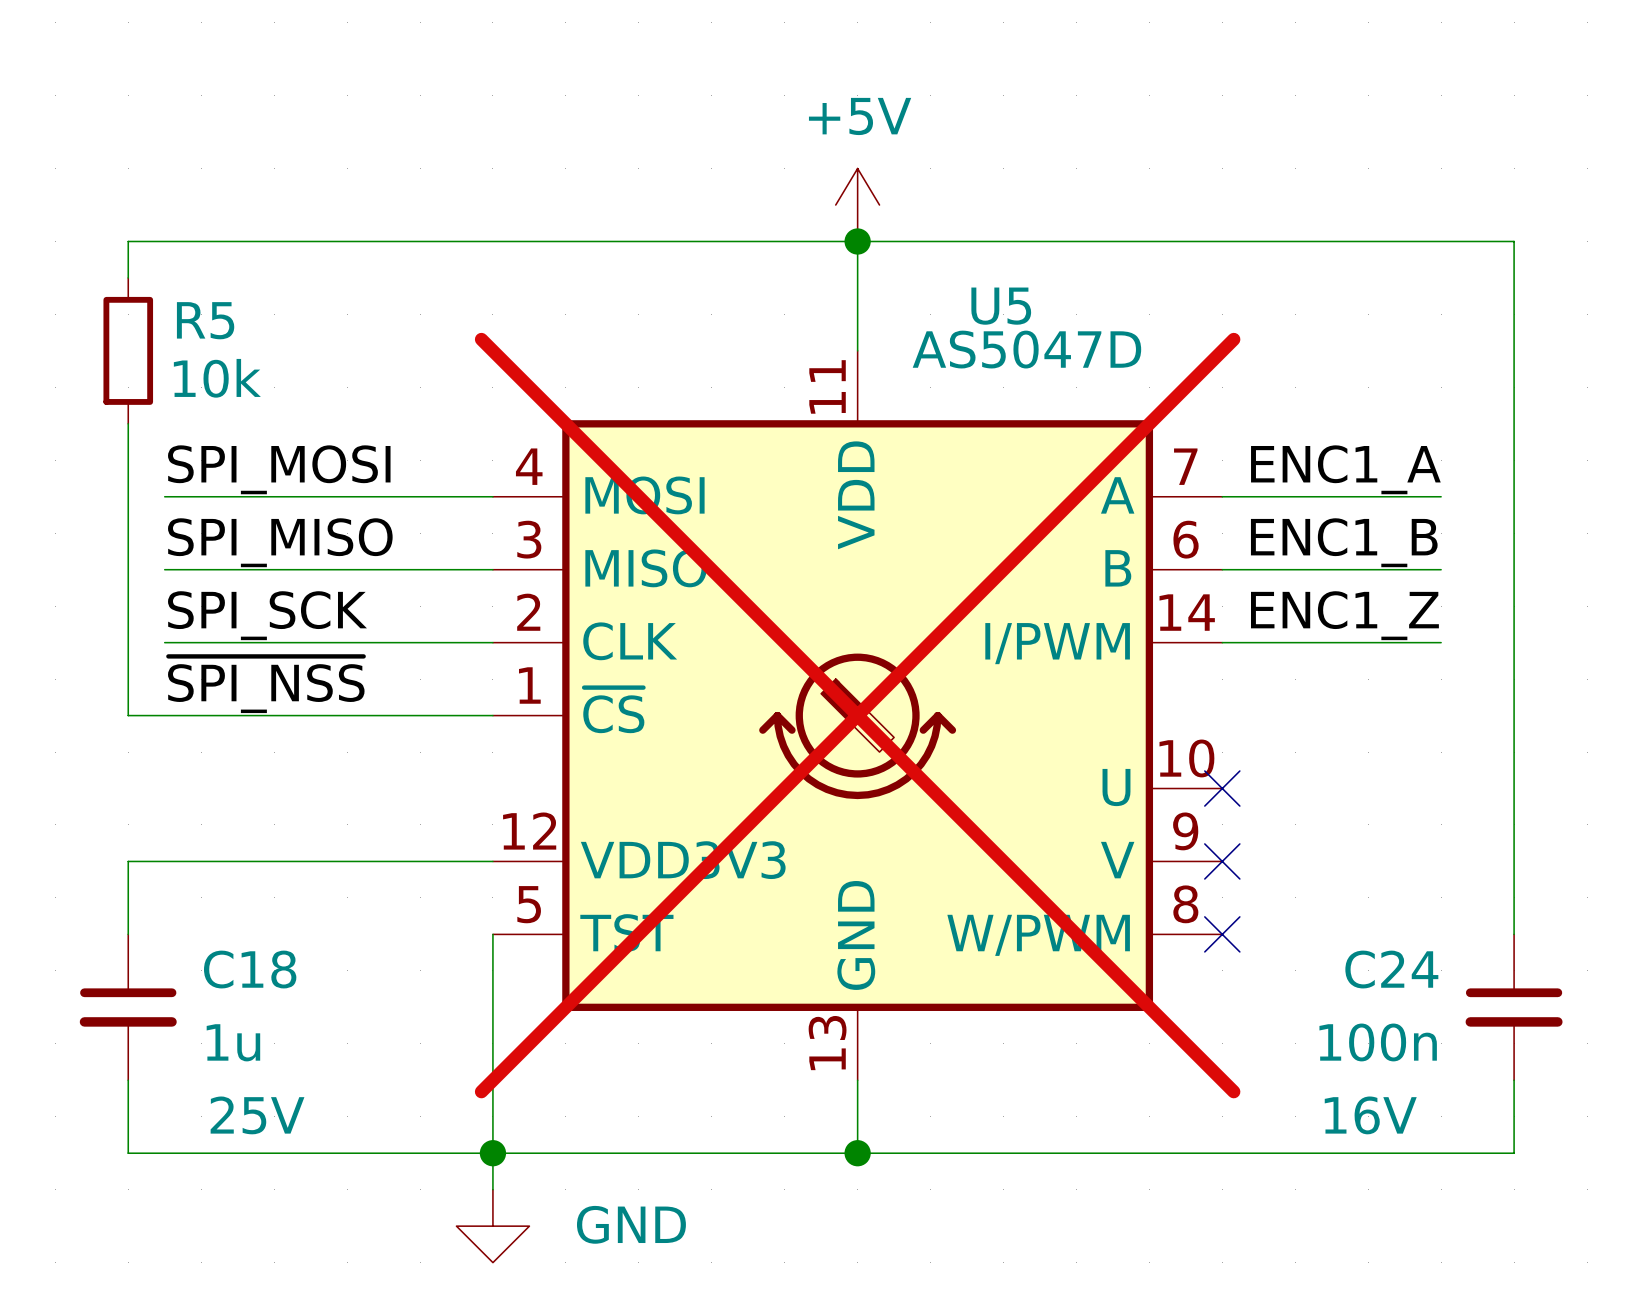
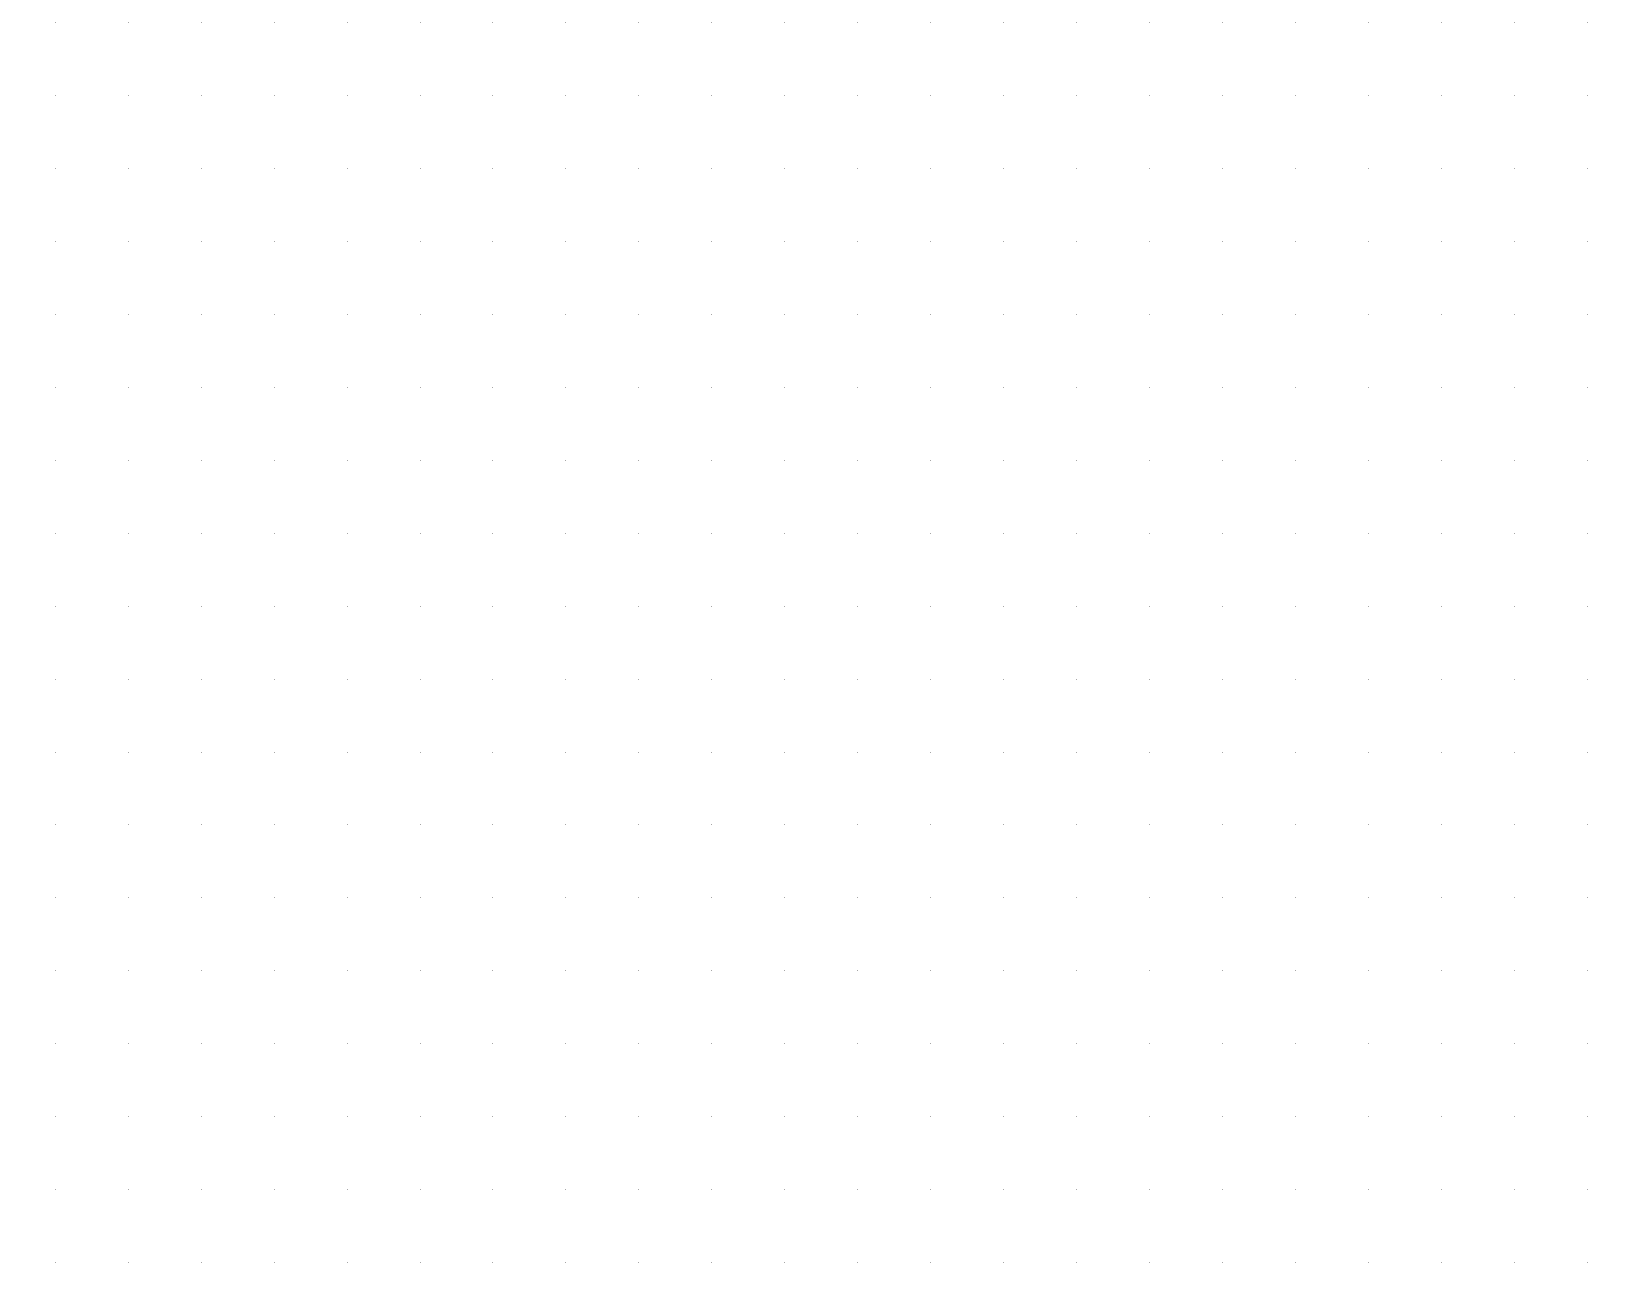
power symbol: +5V (857, 205) -> none
wire: (857, 241) (857, 350) -> none
junction: (857, 241) -> none
wire: (128, 277) (128, 241) (1514, 241) (1514, 934) -> none
R5: 10k (128, 350) -> none
wire: (128, 423) (128, 715) (492, 715) -> none
label: SPI_MOSI (279, 469) -> none
label: ENC1_A (1345, 469) -> none
wire: (164, 496) (492, 496) -> none
wire: (1222, 496) (1441, 496) -> none
label: SPI_MISO (280, 542) -> none
label: ENC1_B (1344, 542) -> none
wire: (164, 569) (492, 569) -> none
wire: (1222, 569) (1441, 569) -> none
label: SPI_SCK (267, 615) -> none
label: ENC1_Z (1344, 615) -> none
wire: (164, 642) (492, 642) -> none
wire: (1222, 642) (1441, 642) -> none
label: ~{SPI_NSS} (266, 684) -> none
U5: AS5047D (857, 715) -> none
no-connect mark: (1222, 788) -> none
wire: (492, 861) (128, 861) (128, 934) -> none
no-connect mark: (1222, 861) -> none
wire: (492, 934) (492, 1189) -> none
no-connect mark: (1222, 934) -> none
C18: 1u (128, 1007) -> none
C24: 100n (1514, 1007) -> none
wire: (128, 1080) (128, 1153) (1514, 1153) (1514, 1080) -> none
wire: (857, 1080) (857, 1153) -> none
junction: (492, 1153) -> none
junction: (857, 1153) -> none
power symbol: GND (492, 1226) -> none

